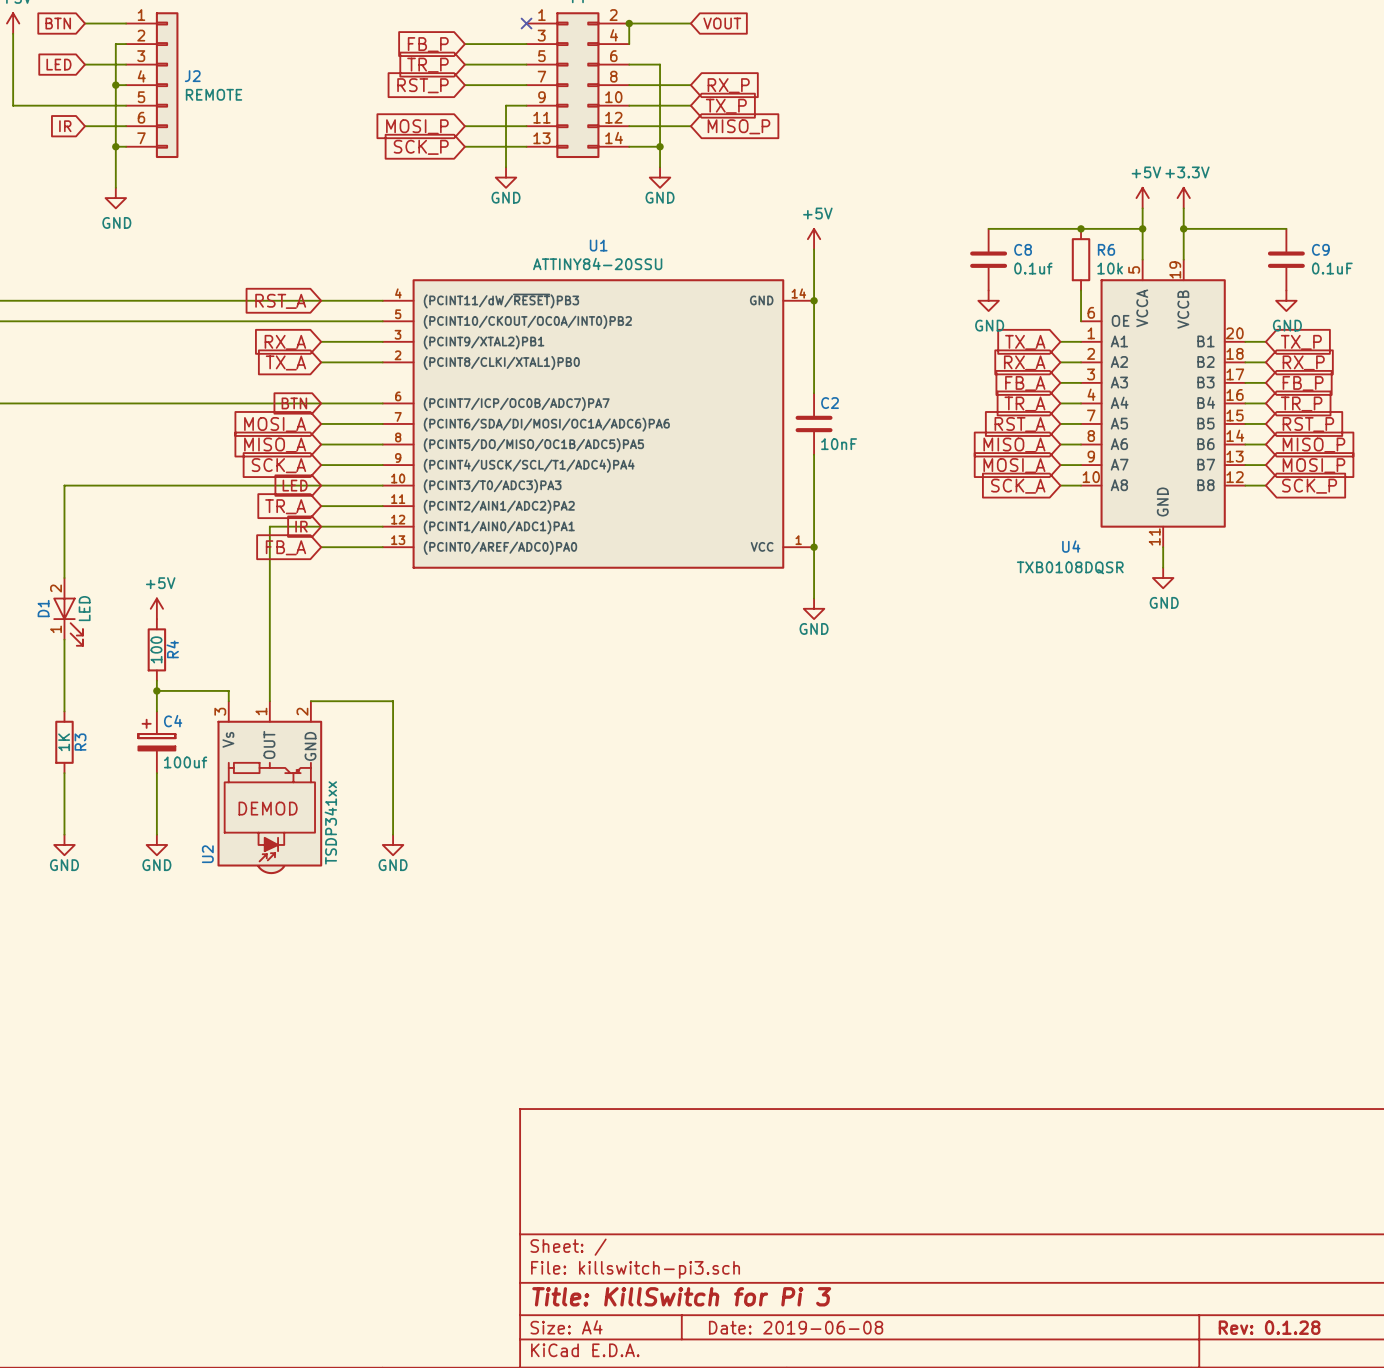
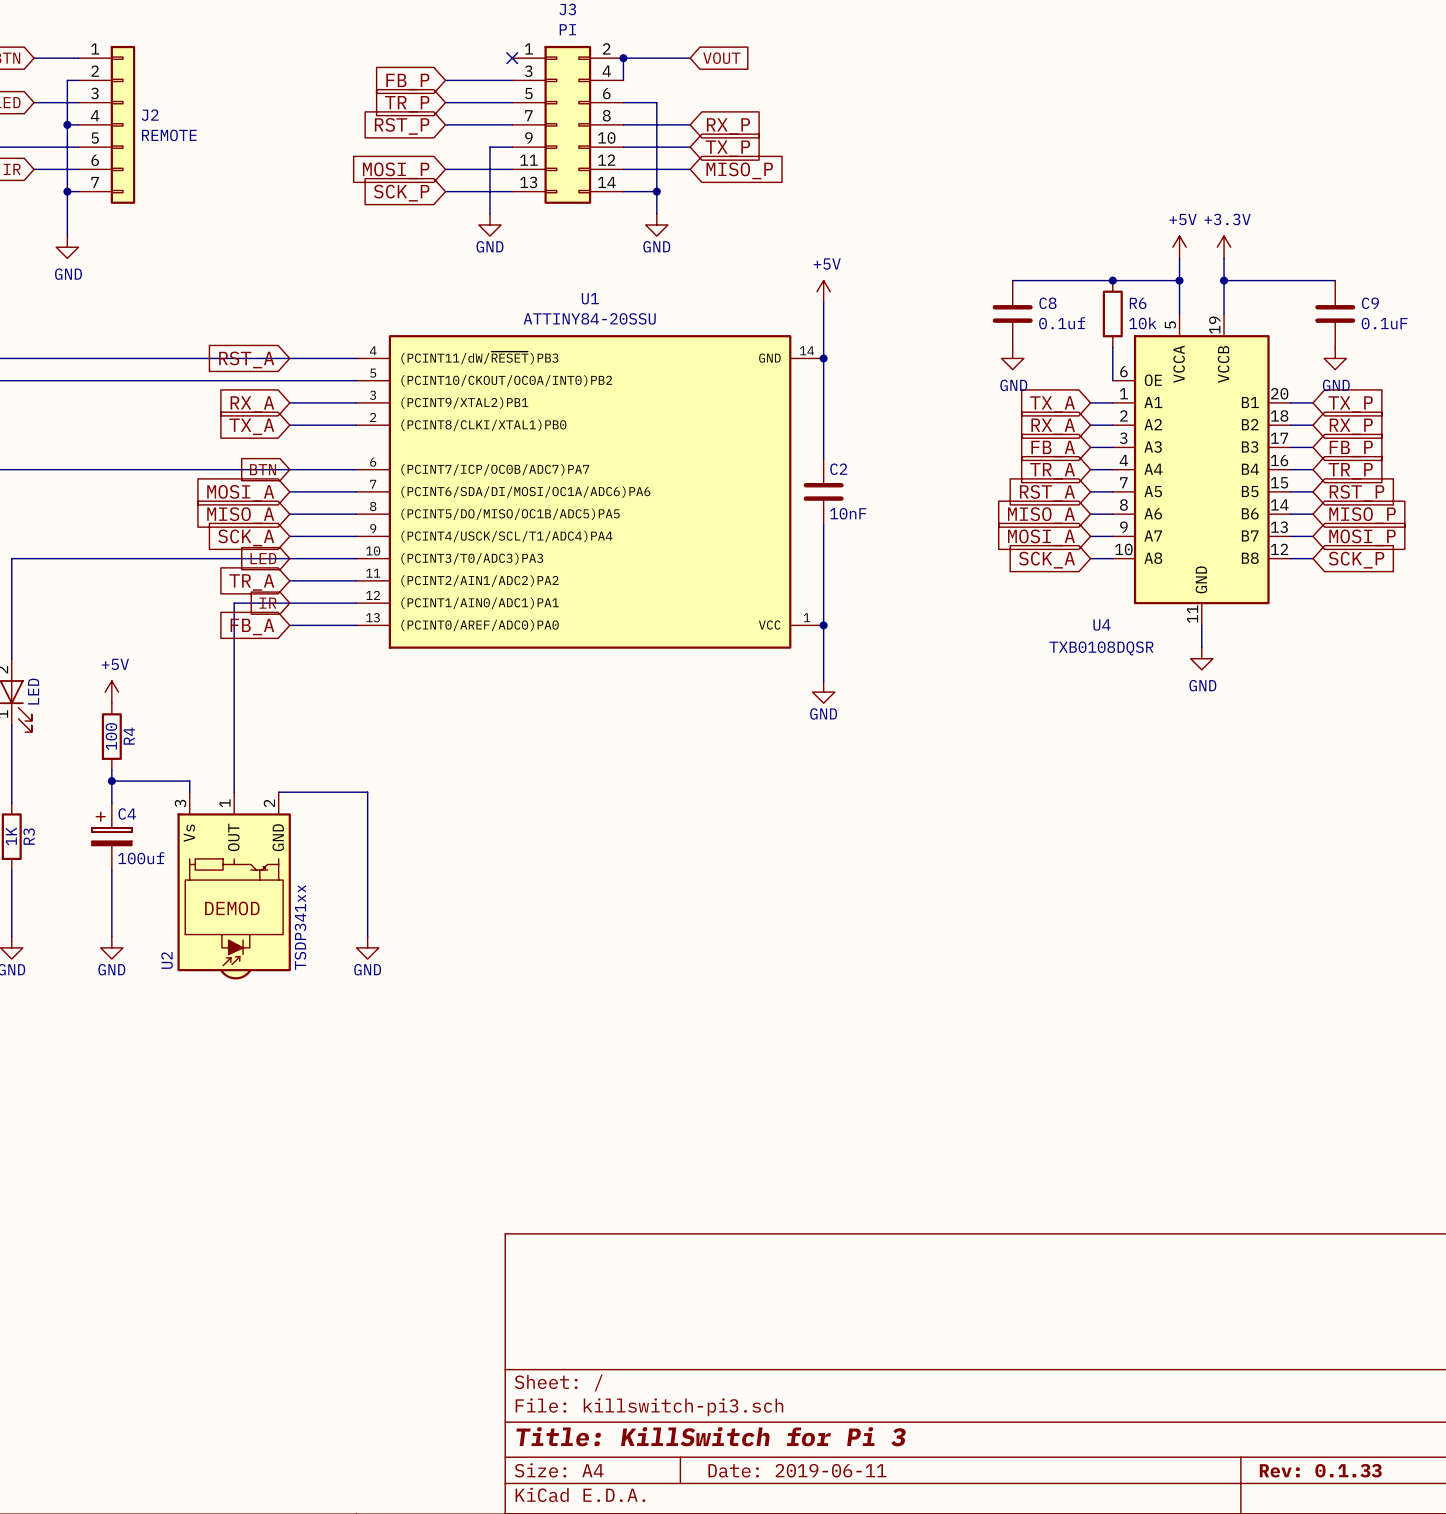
title block: Date: 2019-06-08 (796, 1327) -> Date: 2019-06-11 (797, 1470)
title block: Rev: 0.1.28 (1269, 1327) -> Rev: 0.1.33 (1320, 1470)

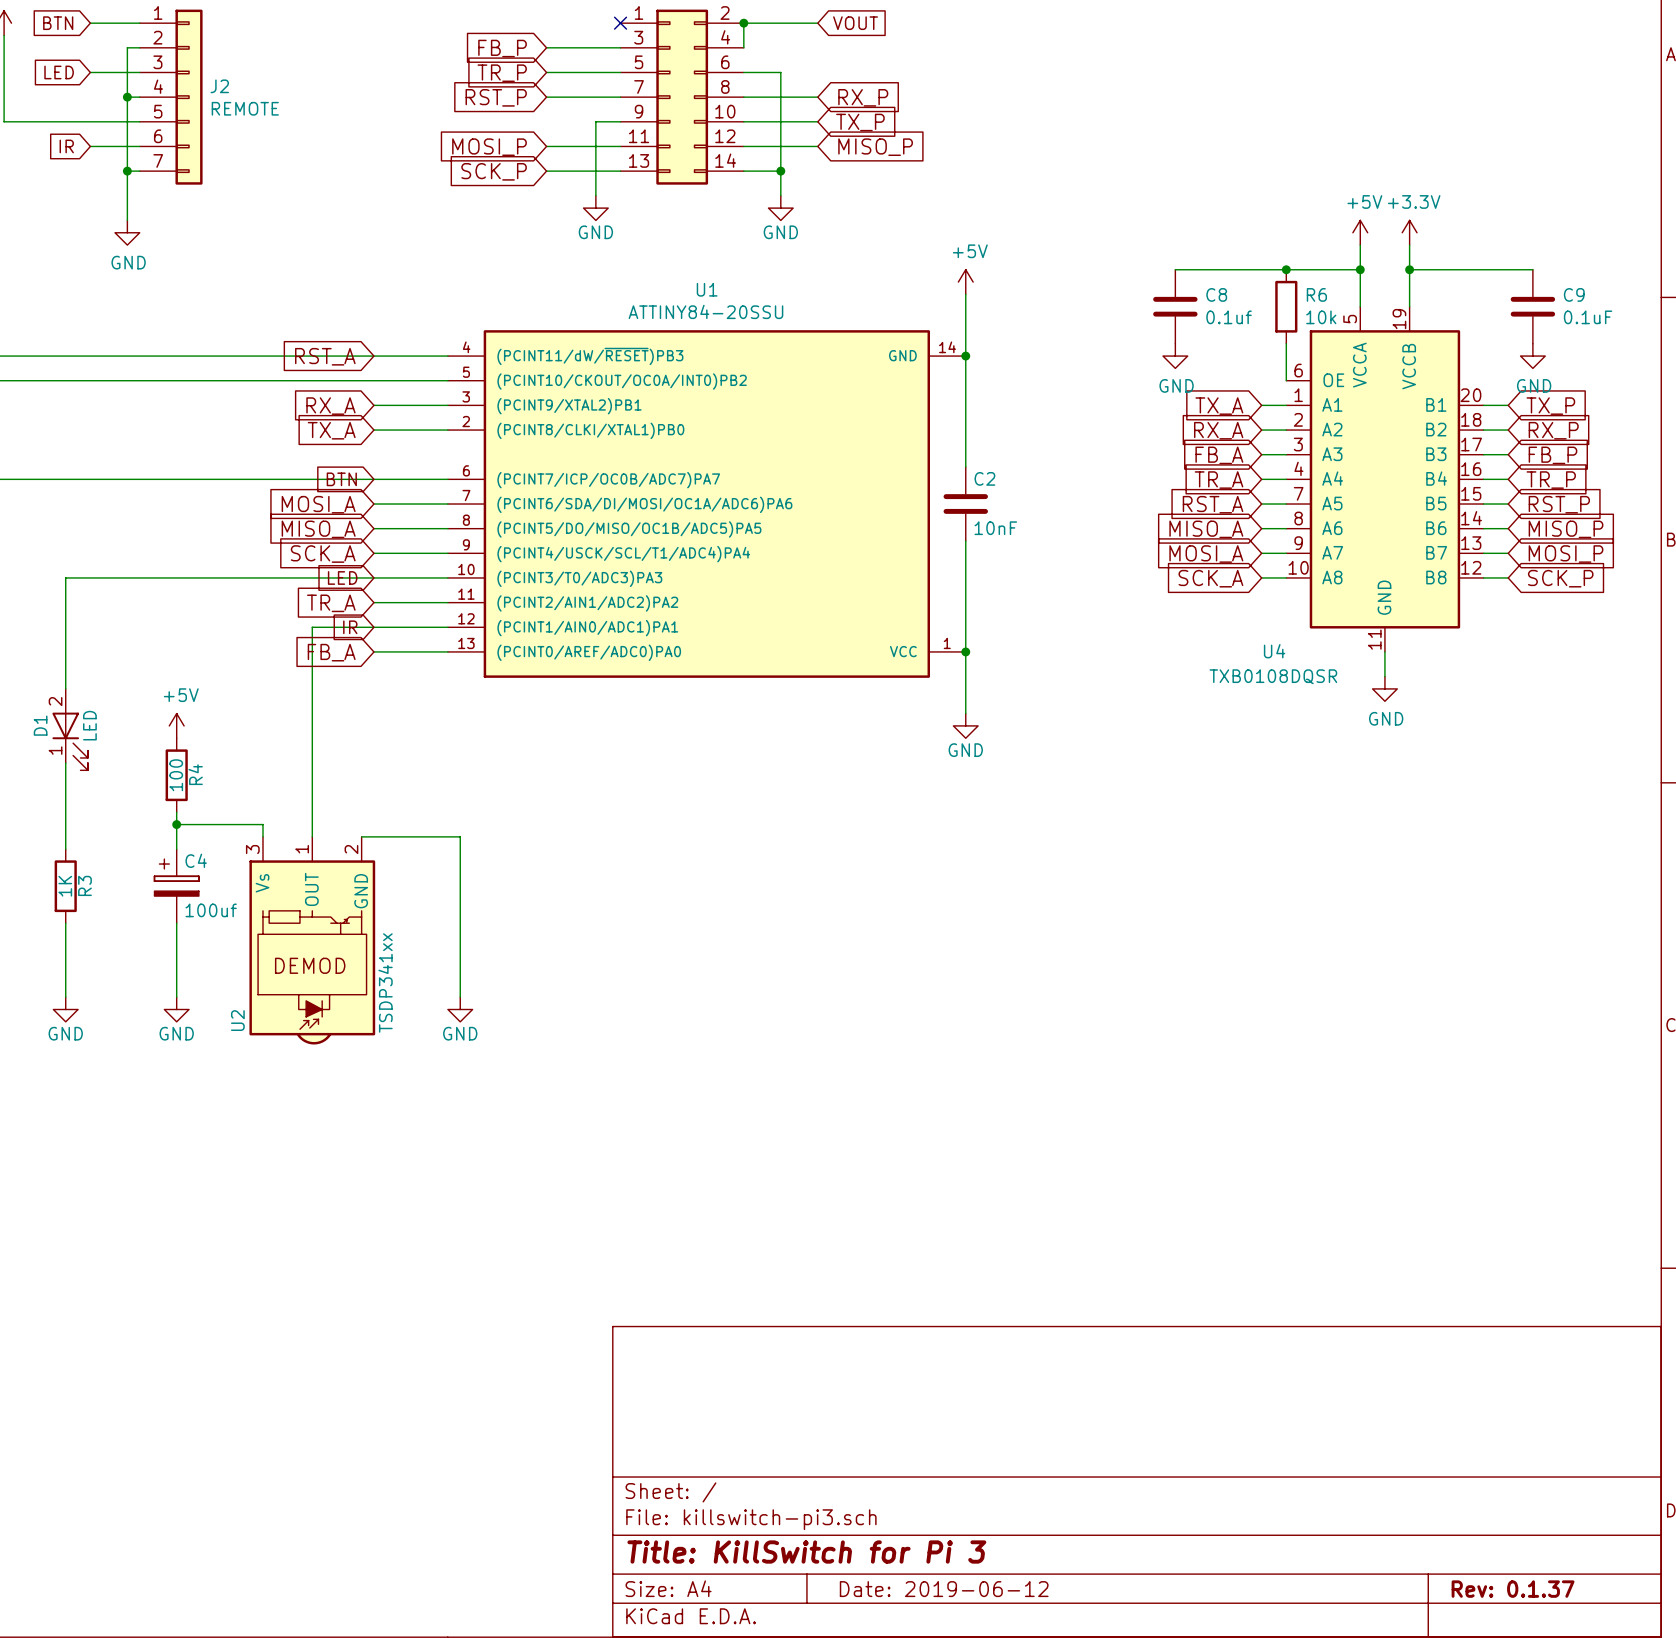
title block: Date: 2019-06-11 (797, 1470) -> Date: 2019-06-12 (944, 1589)
title block: Rev: 0.1.33 (1320, 1470) -> Rev: 0.1.37 (1513, 1589)

